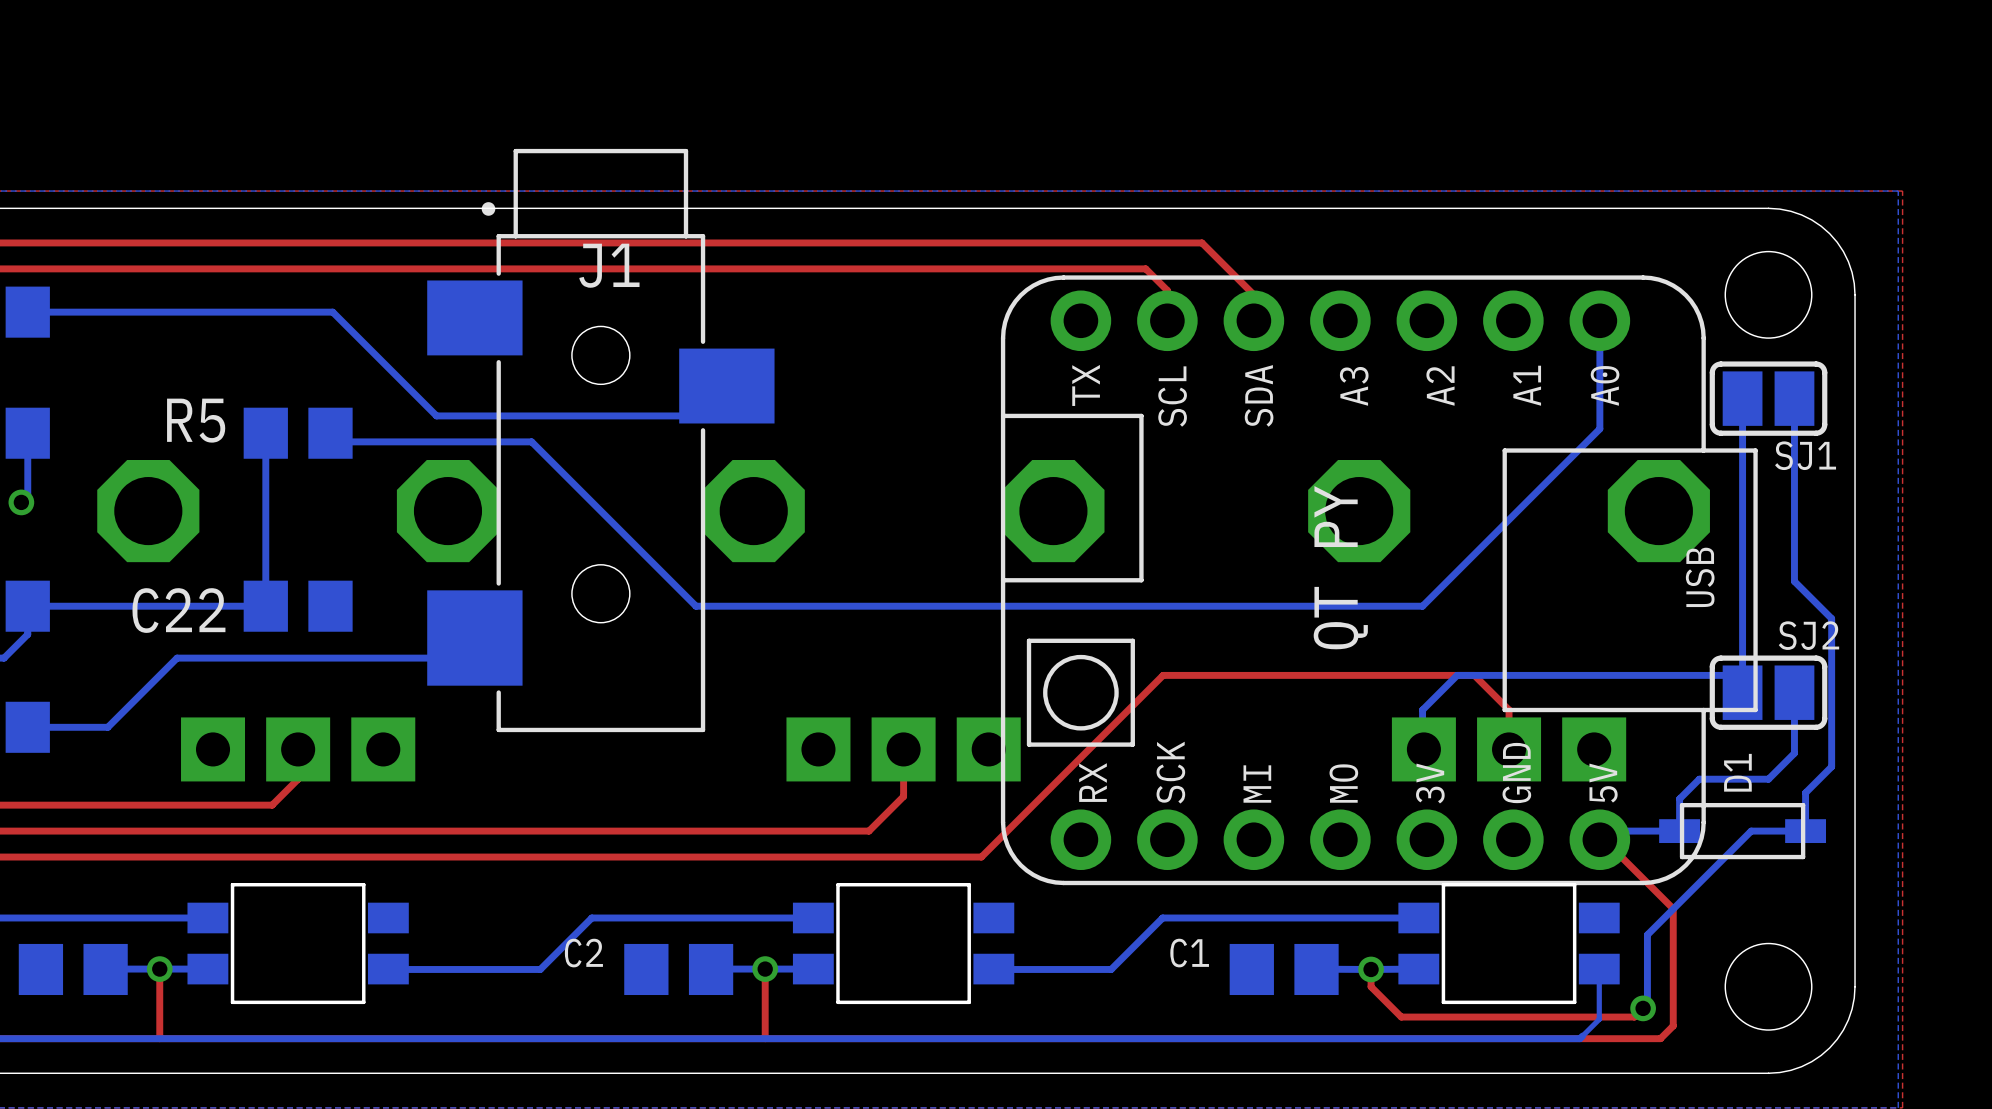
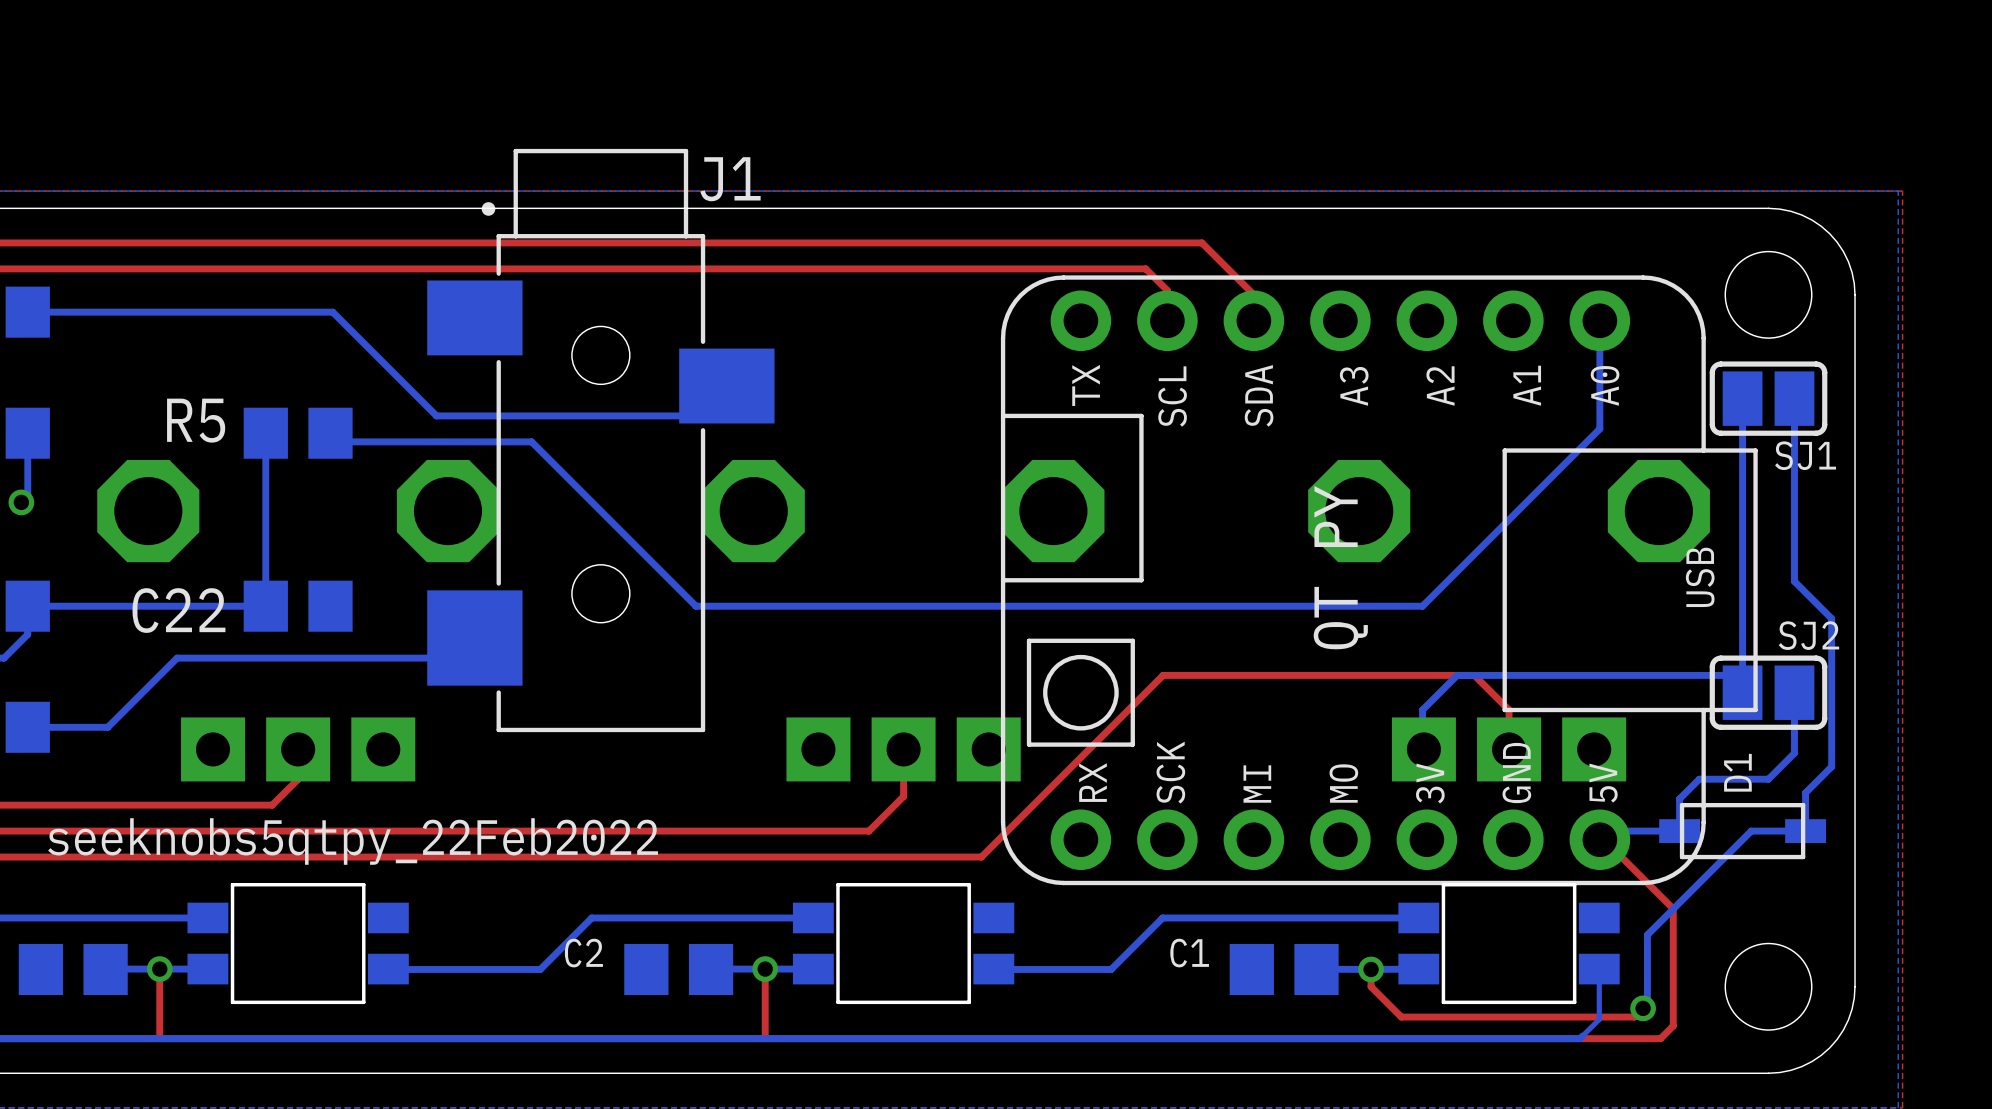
J1 name position: J1 (609, 265) -> J1 (730, 179)
text: none -> seeknobs5qtpy_22Feb2022 (353, 841)

